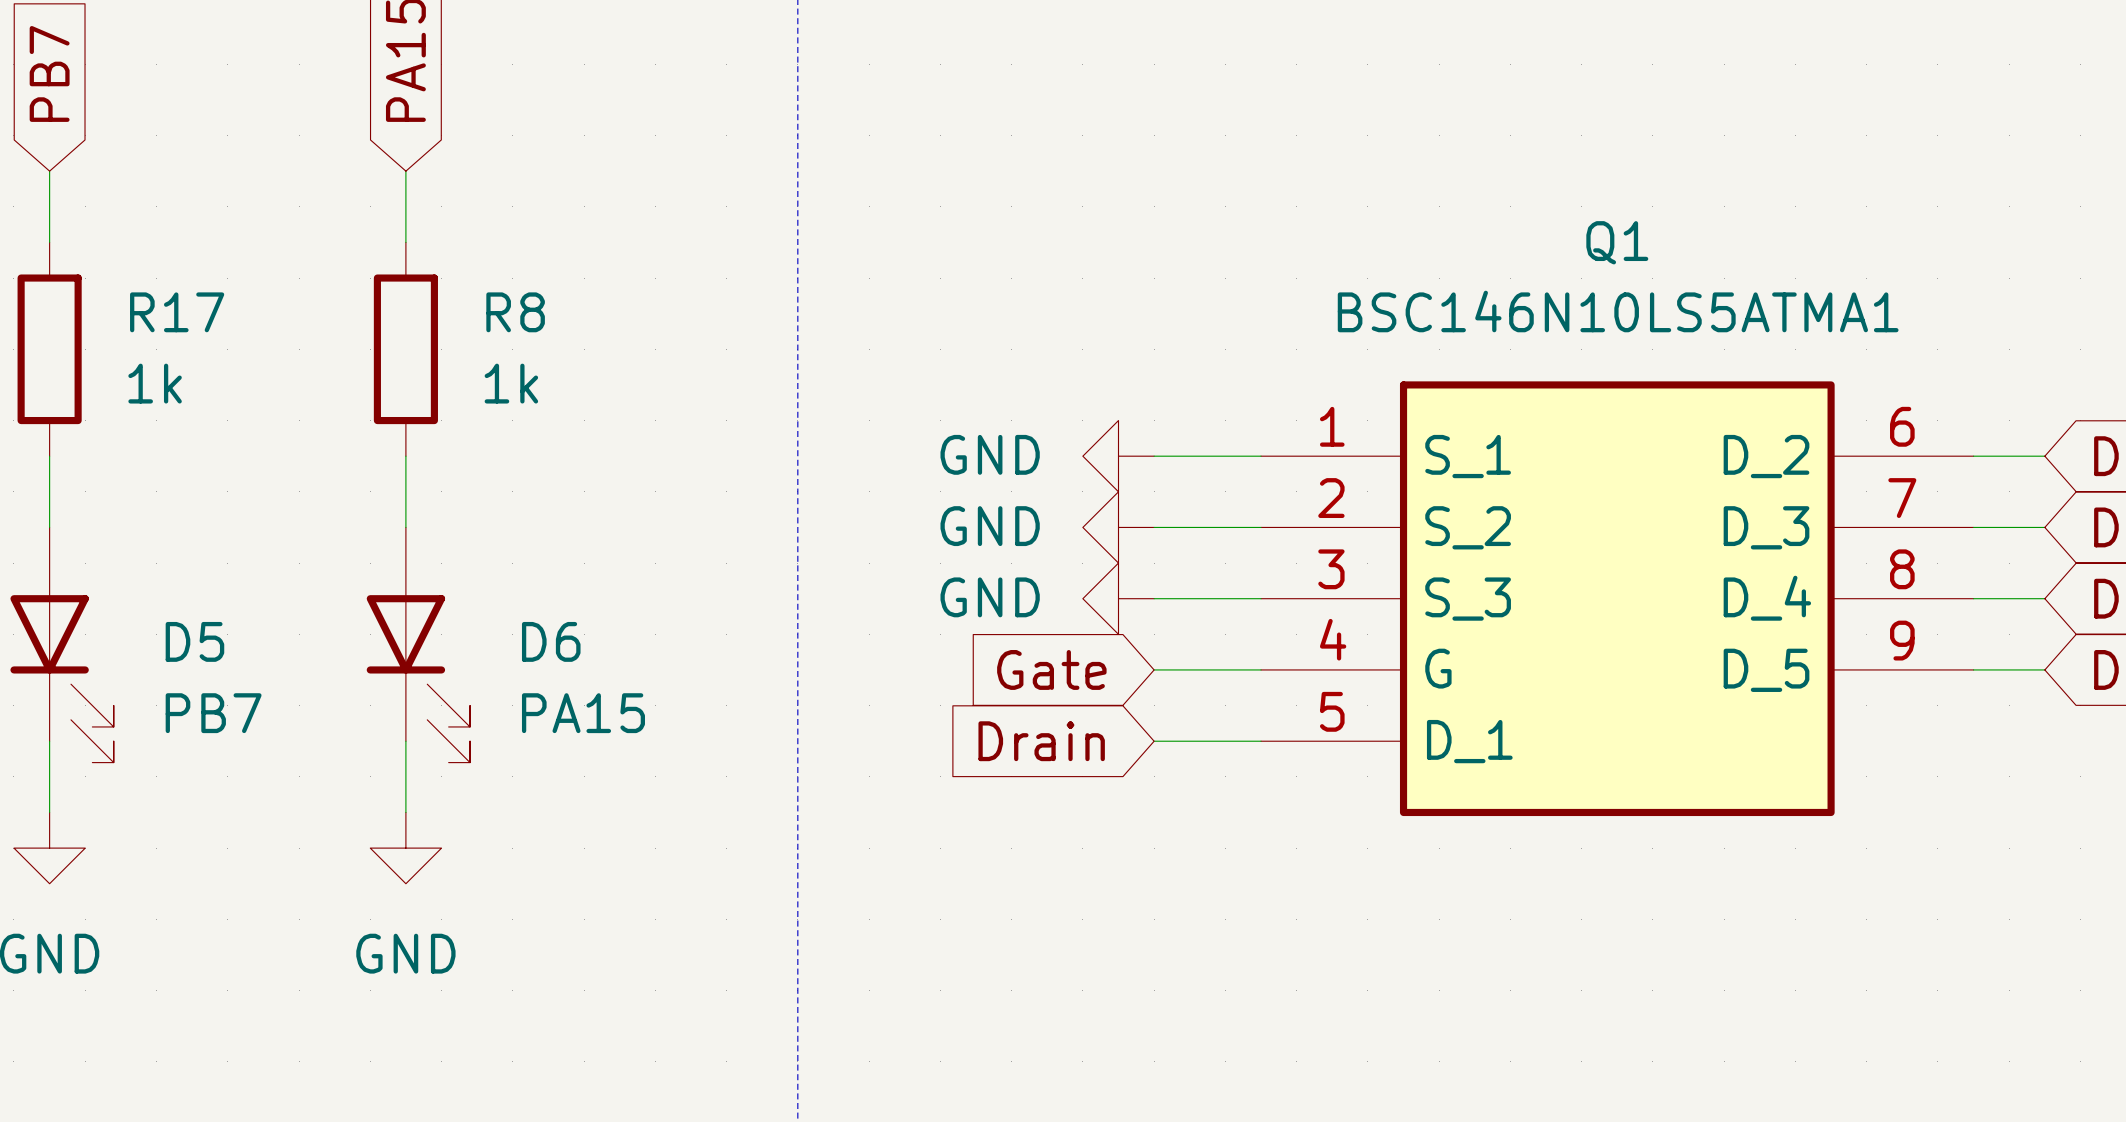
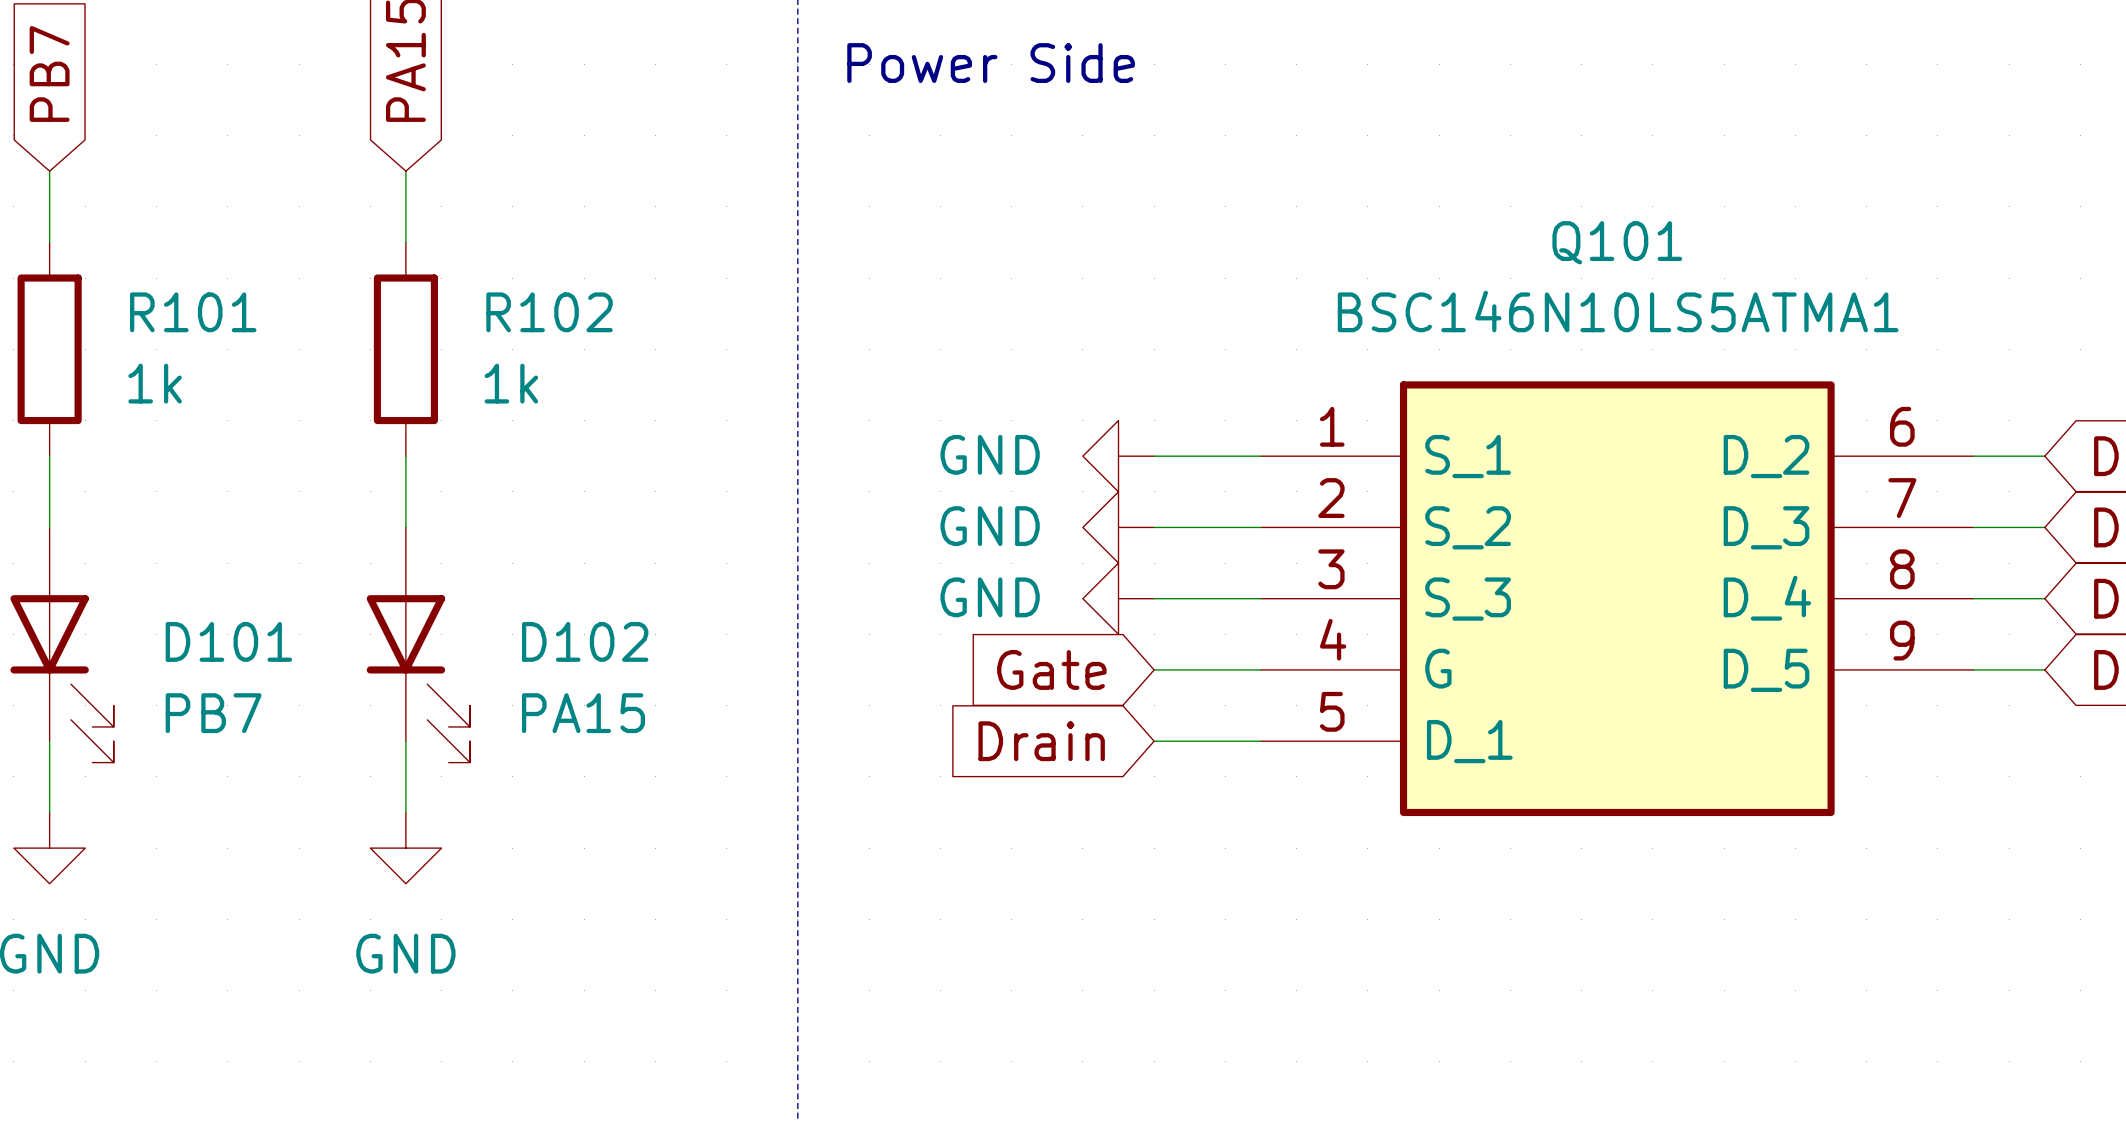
text: none -> Power Side (991, 63)
Q1 name: Q1 (1617, 242) -> Q101 (1617, 242)
R17 name: R17 (177, 312) -> R101 (193, 312)
R8 name: R8 (515, 312) -> R102 (549, 312)
D5 name: D5 (194, 641) -> D101 (228, 641)
D6 name: D6 (551, 641) -> D102 (585, 641)

